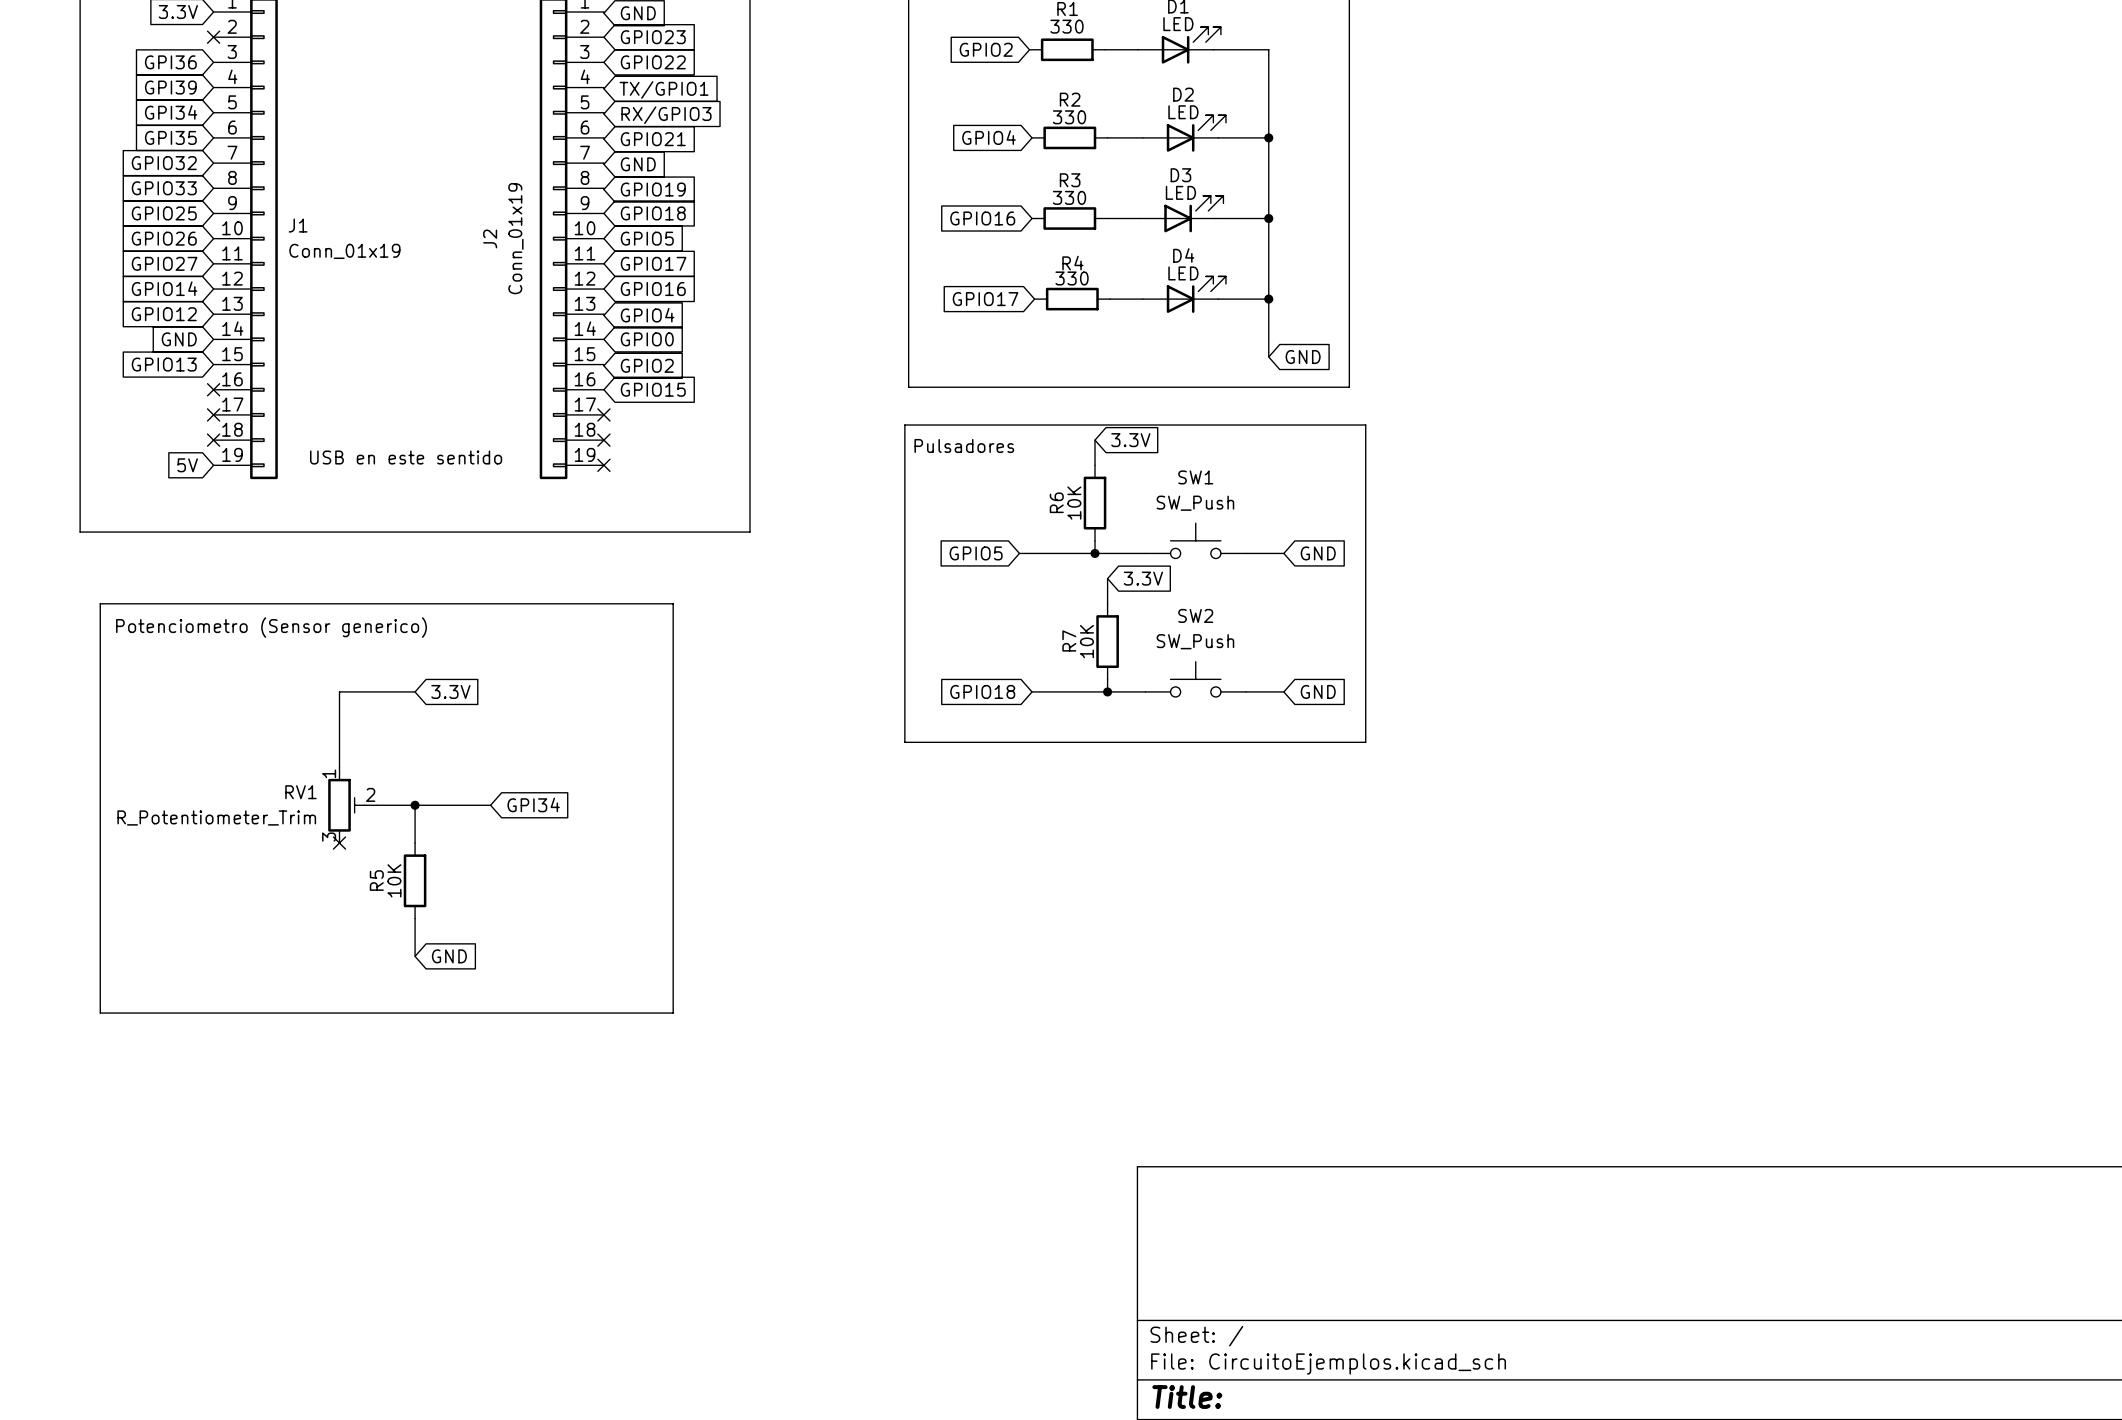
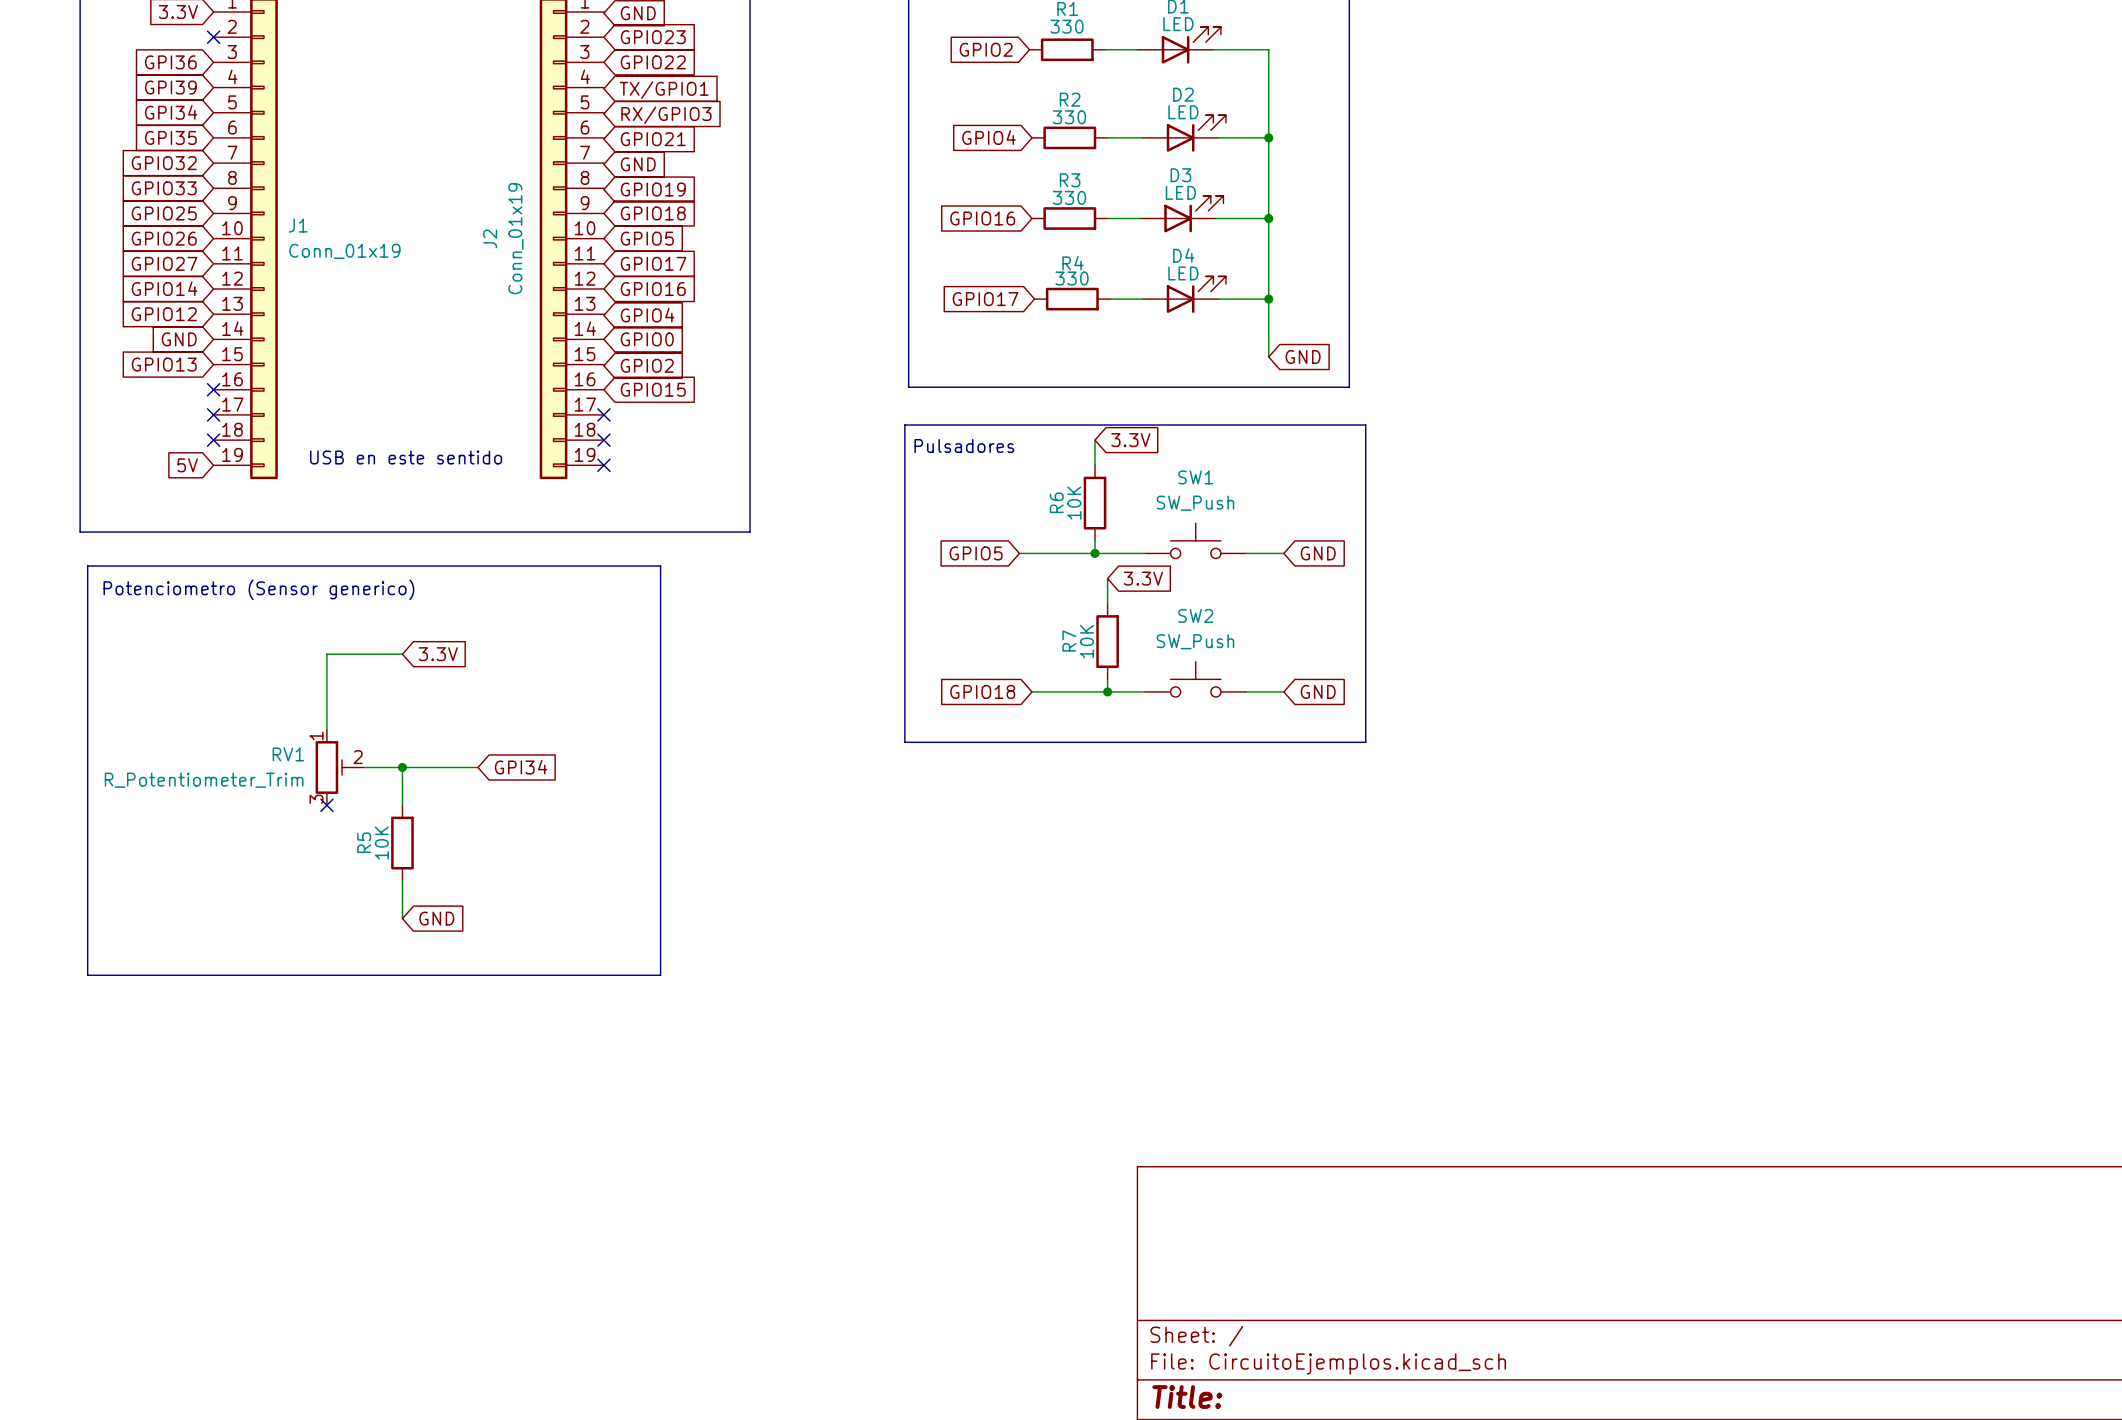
line: (100, 603) (673, 603) (673, 1013) (100, 1013) (100, 603) -> (87, 566) (660, 566) (660, 975) (87, 975) (87, 566)
text position: Potenciometro (Sensor generico) (271, 627) -> Potenciometro (Sensor generico) (258, 589)
wire: (415, 691) (339, 691) (339, 767) -> (402, 654) (326, 654) (326, 729)
global label position: 3.3V (450, 691) -> 3.3V (438, 654)
global label position: GPI34 (533, 804) -> GPI34 (521, 767)
RV1 position: (352, 805) -> (340, 767)
wire: (377, 805) (490, 805) -> (364, 767) (478, 767)
wire: (415, 805) (415, 843) -> (402, 767) (402, 805)
junction position: (415, 805) -> (402, 767)
no-connect mark position: (339, 843) -> (326, 805)
R5 position: (415, 880) -> (402, 843)
wire: (415, 918) (415, 956) -> (402, 880) (402, 918)
global label position: GND (449, 956) -> GND (436, 918)

